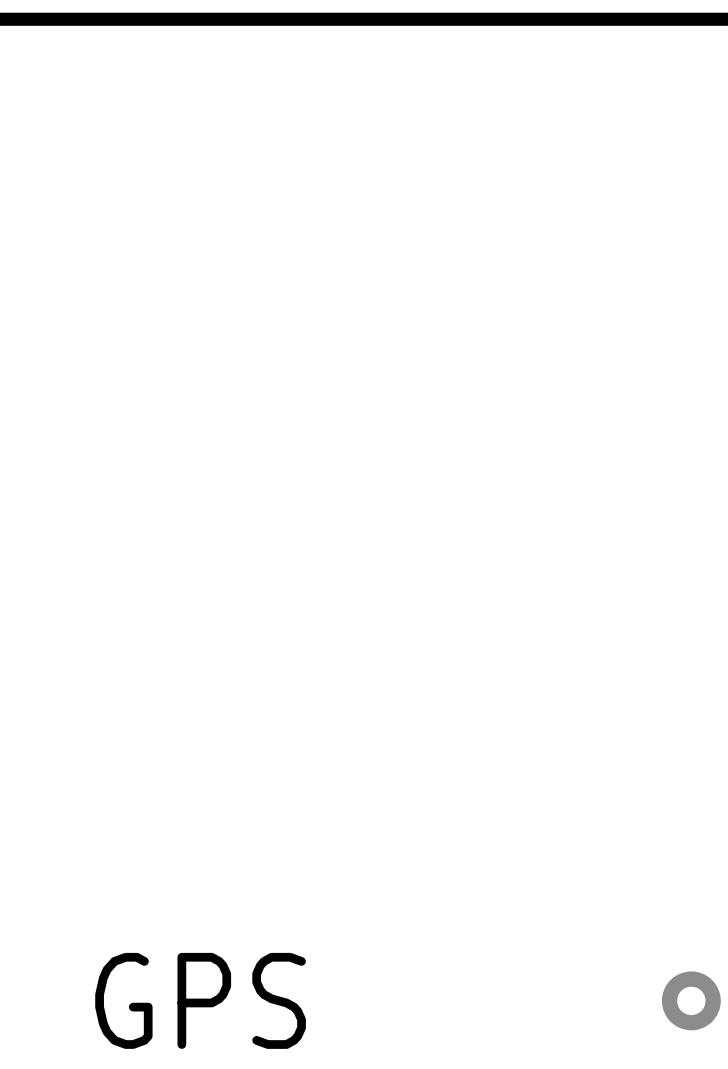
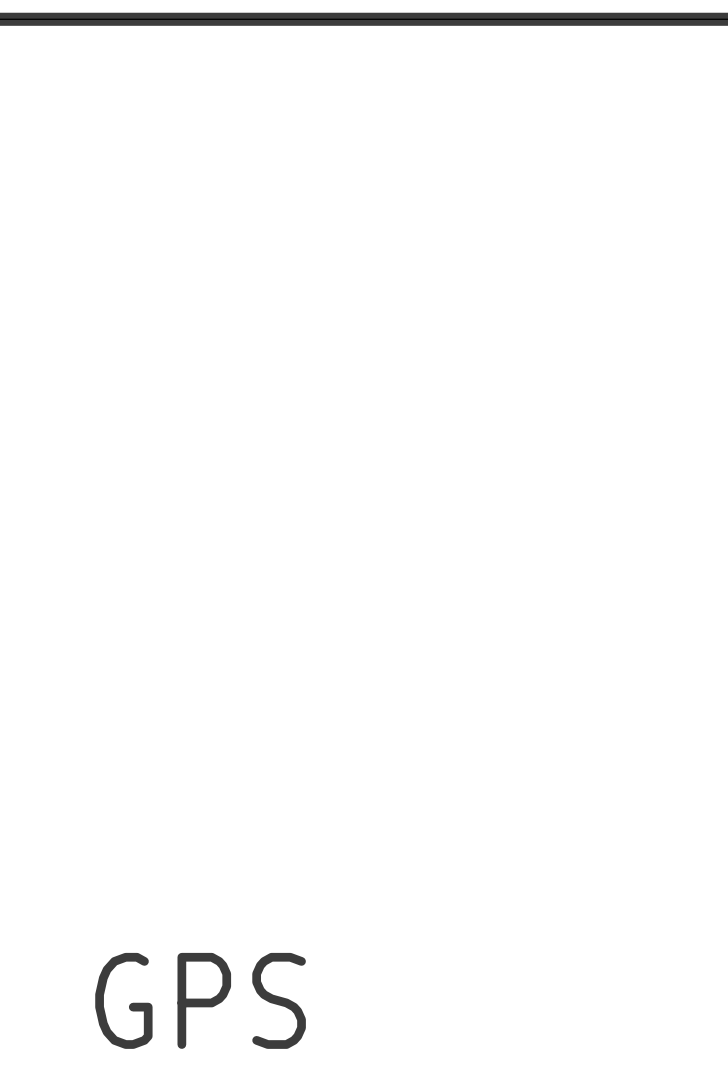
via: (691, 1000) -> none

